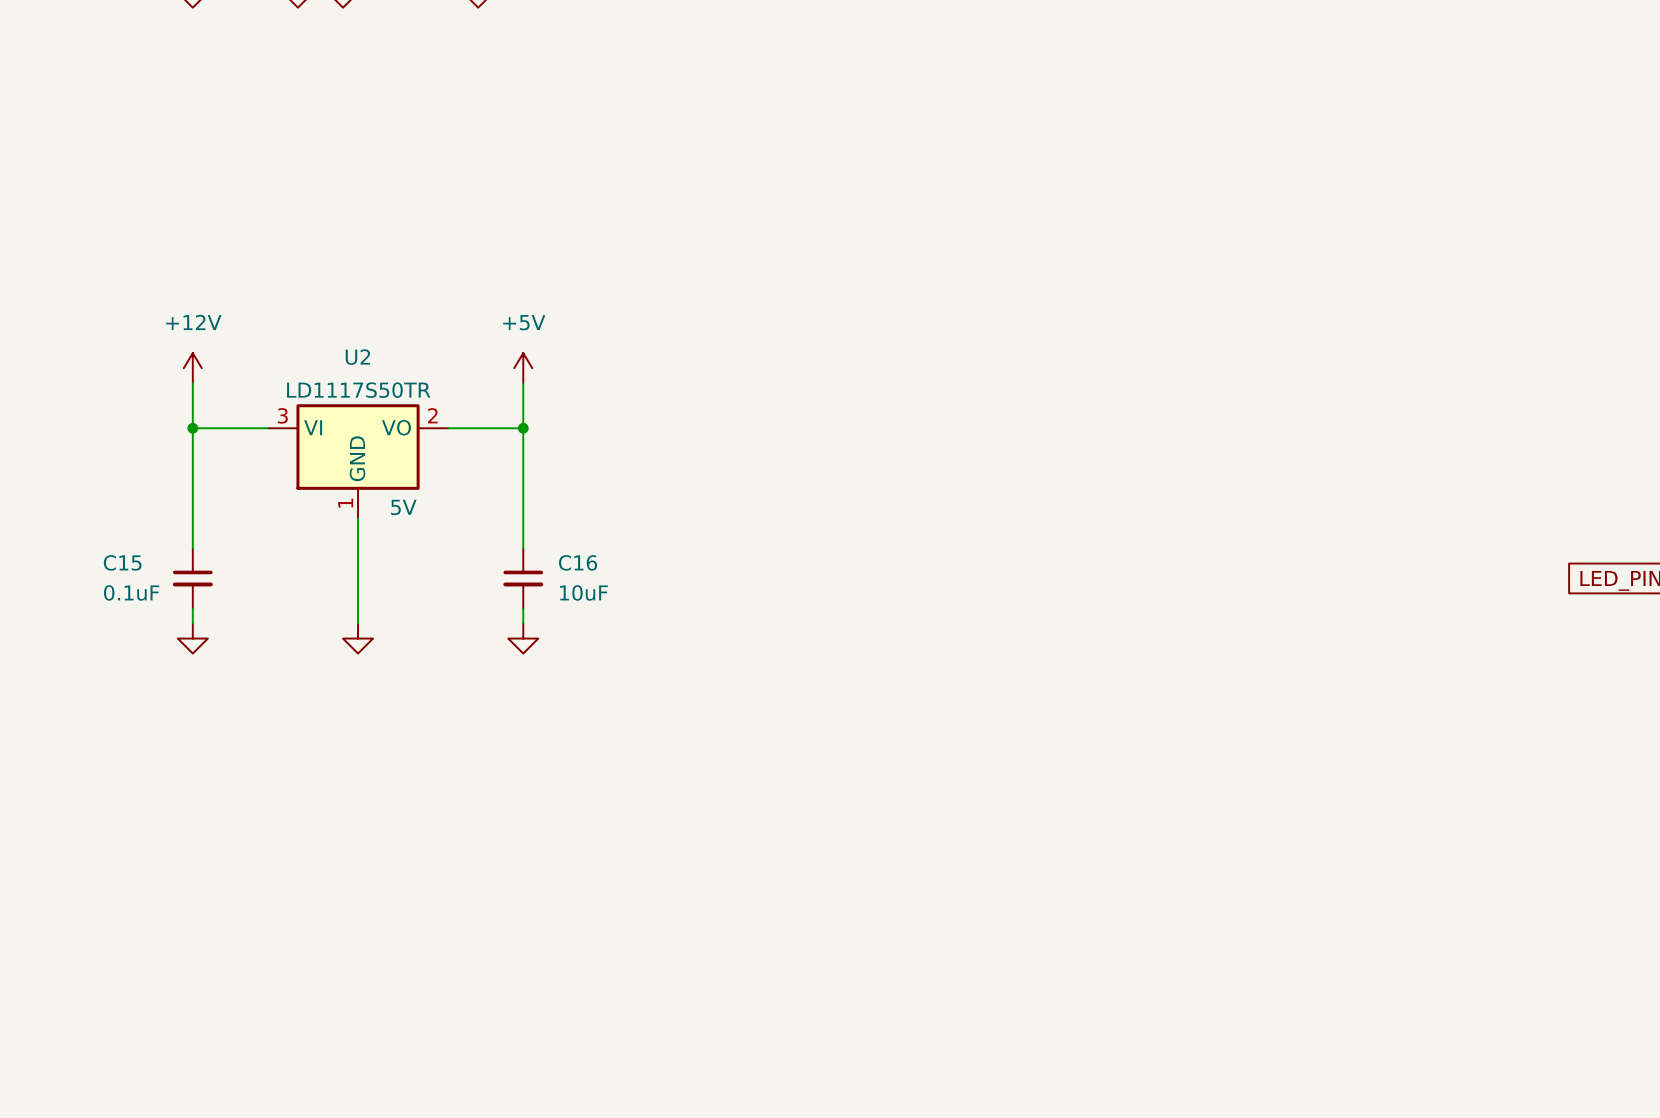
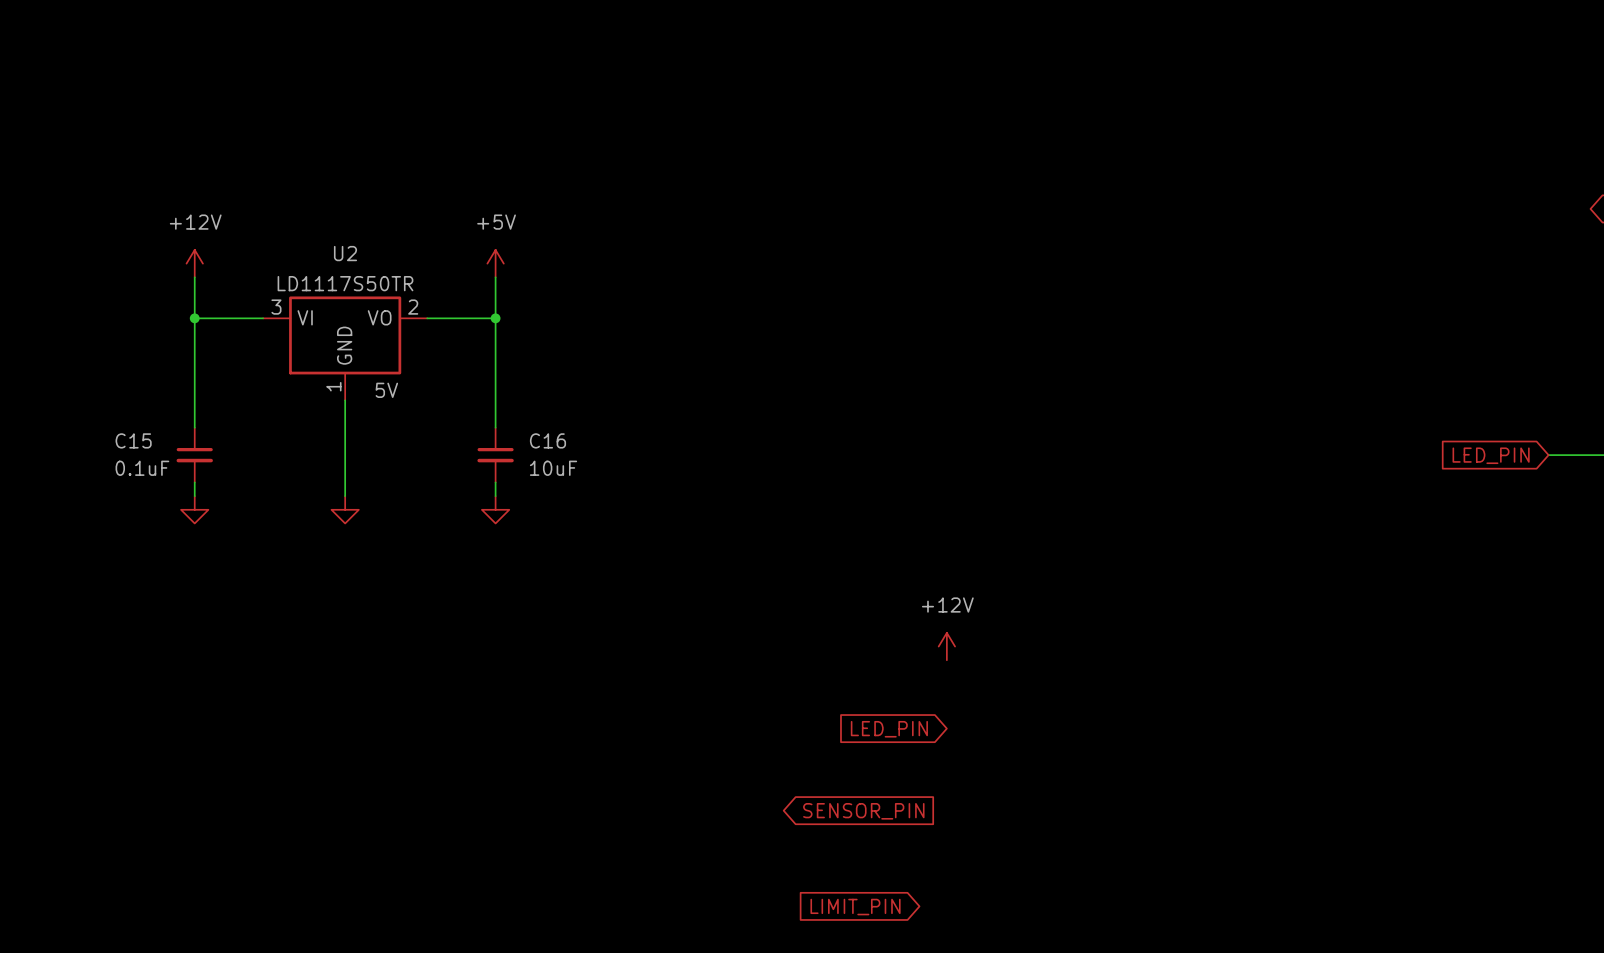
power symbol: none -> +12V (946, 646)
global label: none -> LED_PIN (889, 729)
global label: none -> SENSOR_PIN (863, 811)
global label: none -> LIMIT_PIN (855, 907)

